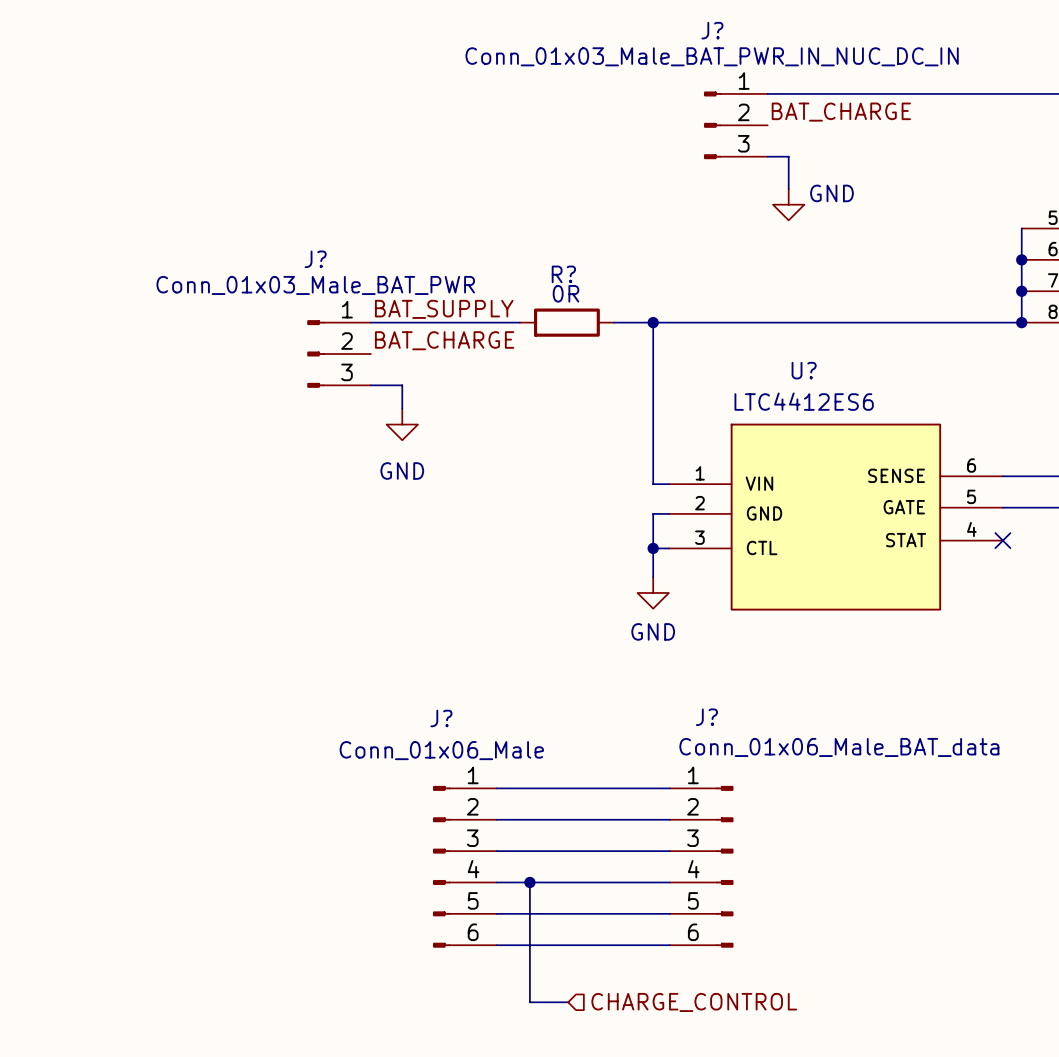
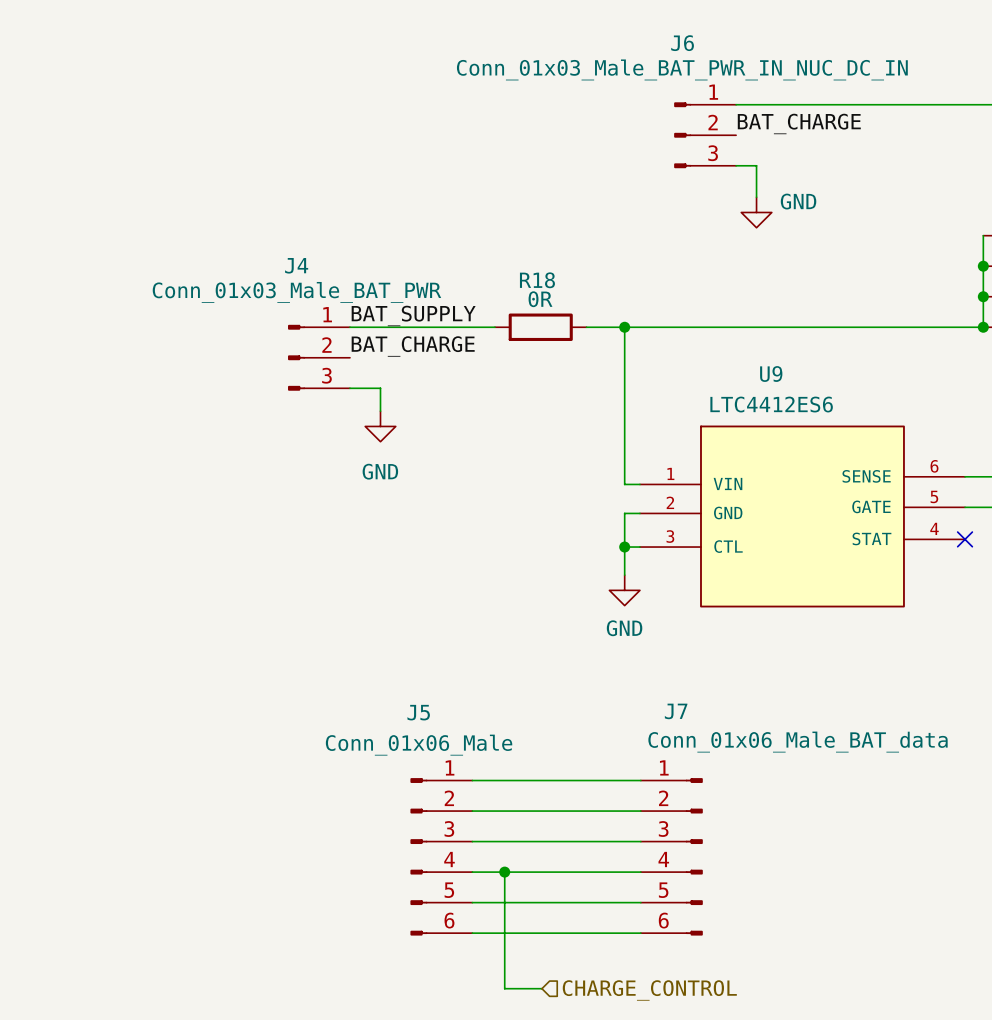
J? name: J? (712, 30) -> J6 (682, 43)
J? name: J? (315, 259) -> J4 (296, 265)
R? name: R? (563, 274) -> R18 (537, 280)
U? name: U? (804, 370) -> U9 (771, 374)
J? name: J? (706, 717) -> J7 (676, 711)
J? name: J? (441, 718) -> J5 (418, 712)

